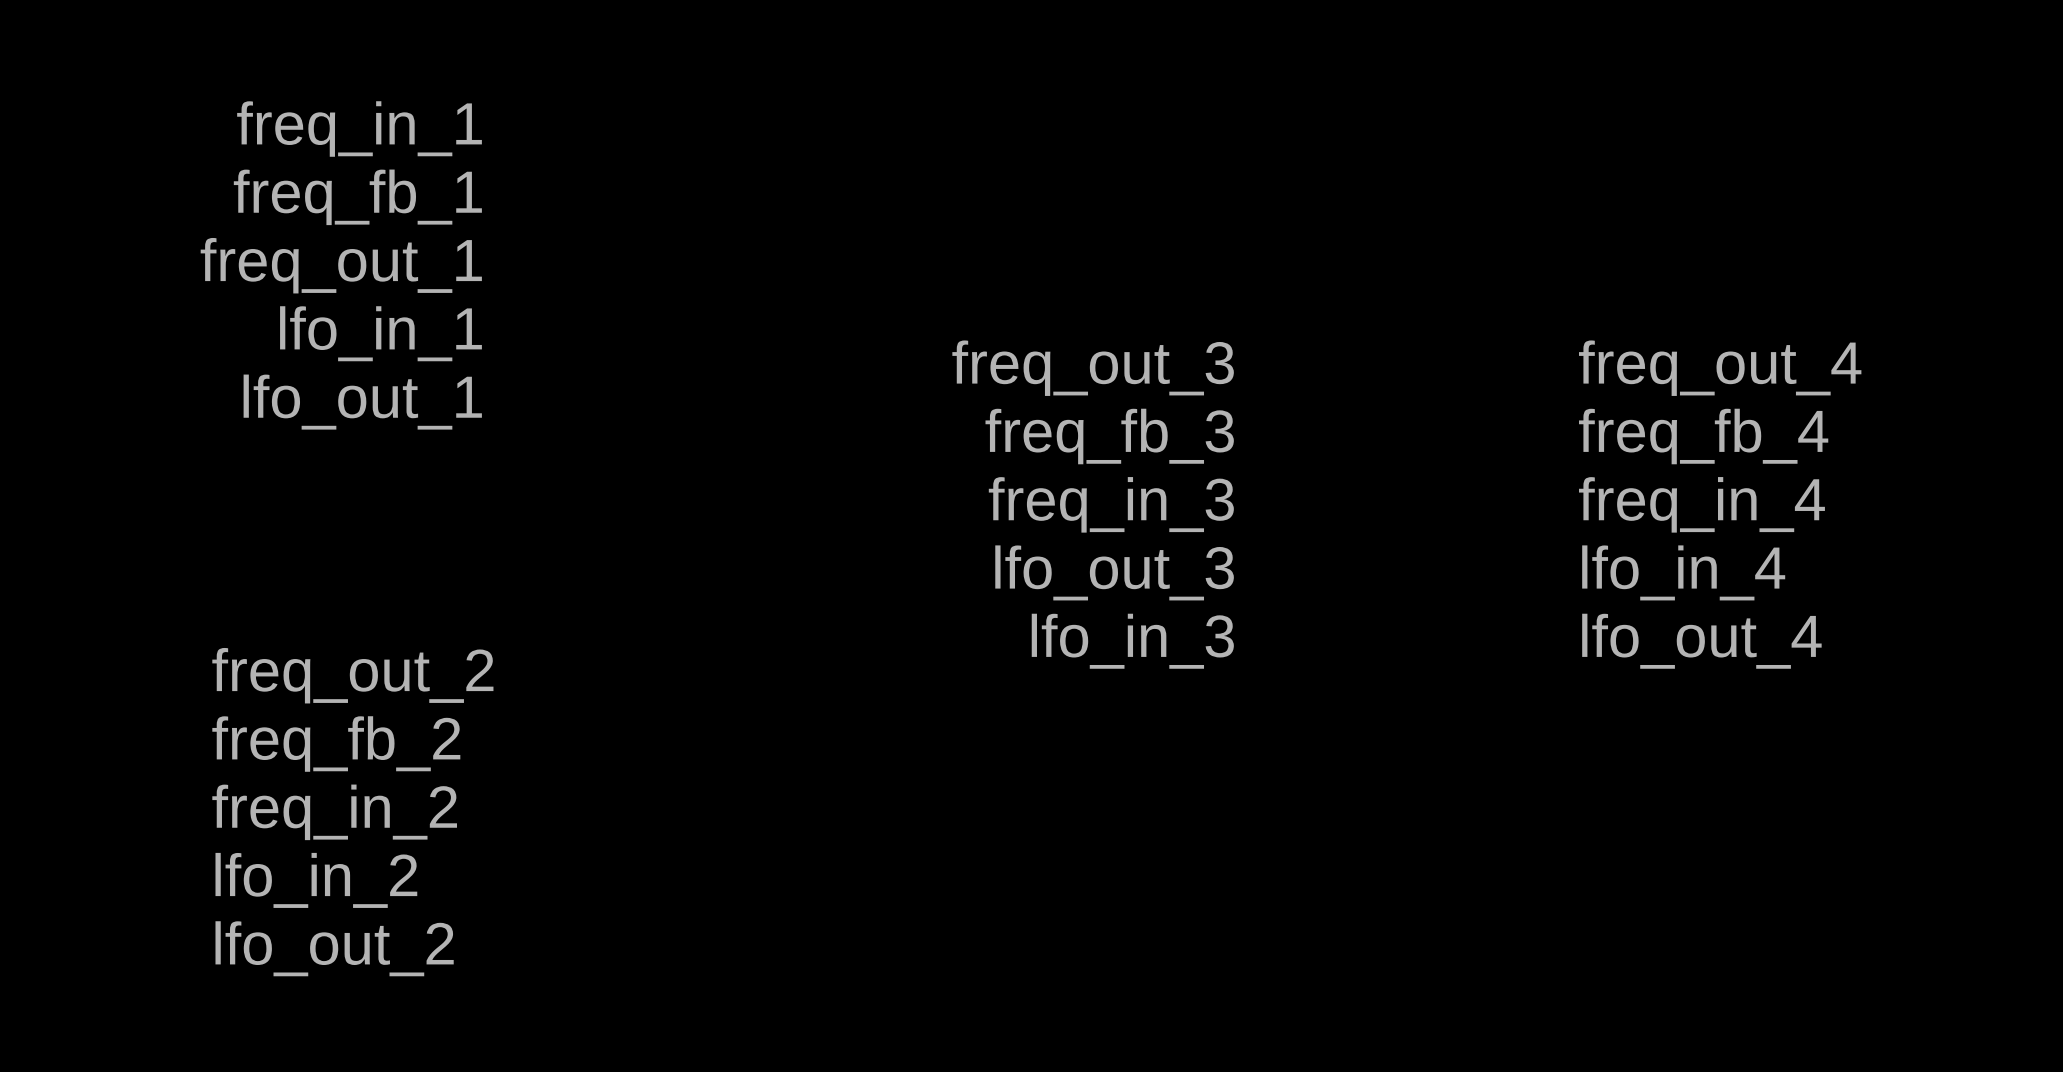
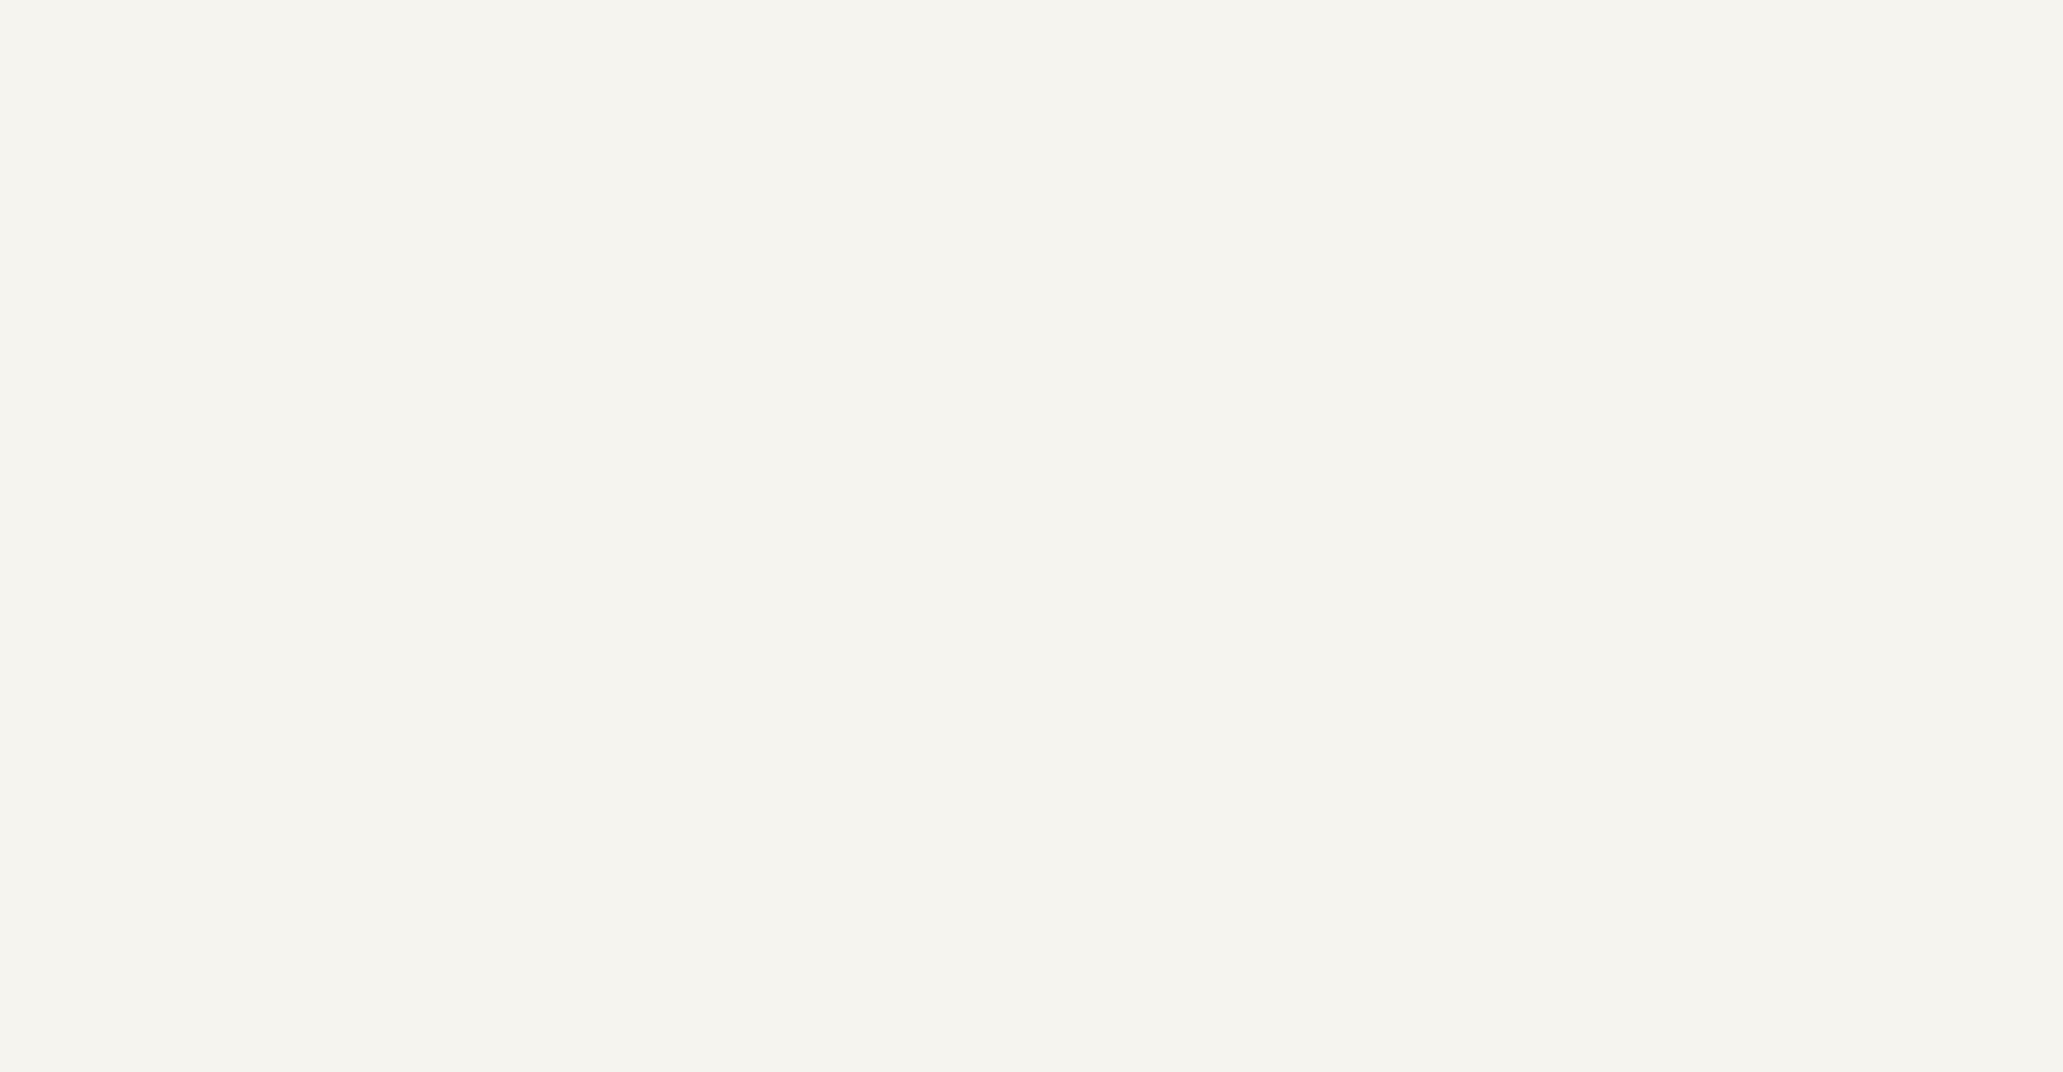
label: freq_in_1 (359, 129) -> none
label: freq_fb_1 (357, 197) -> none
label: freq_out_1 (341, 265) -> none
label: lfo_in_1 (380, 333) -> none
label: freq_out_3 (1093, 368) -> none
label: freq_out_4 (1720, 368) -> none
label: lfo_out_1 (362, 402) -> none
label: freq_fb_3 (1109, 436) -> none
label: freq_fb_4 (1703, 436) -> none
label: freq_in_3 (1111, 504) -> none
label: freq_in_4 (1701, 504) -> none
label: lfo_out_3 (1114, 572) -> none
label: lfo_in_4 (1683, 572) -> none
label: lfo_in_3 (1132, 641) -> none
label: lfo_out_4 (1701, 641) -> none
label: freq_out_2 (352, 675) -> none
label: freq_fb_2 (336, 744) -> none
label: freq_in_2 (334, 812) -> none
label: lfo_in_2 (316, 880) -> none
label: lfo_out_2 (334, 948) -> none

